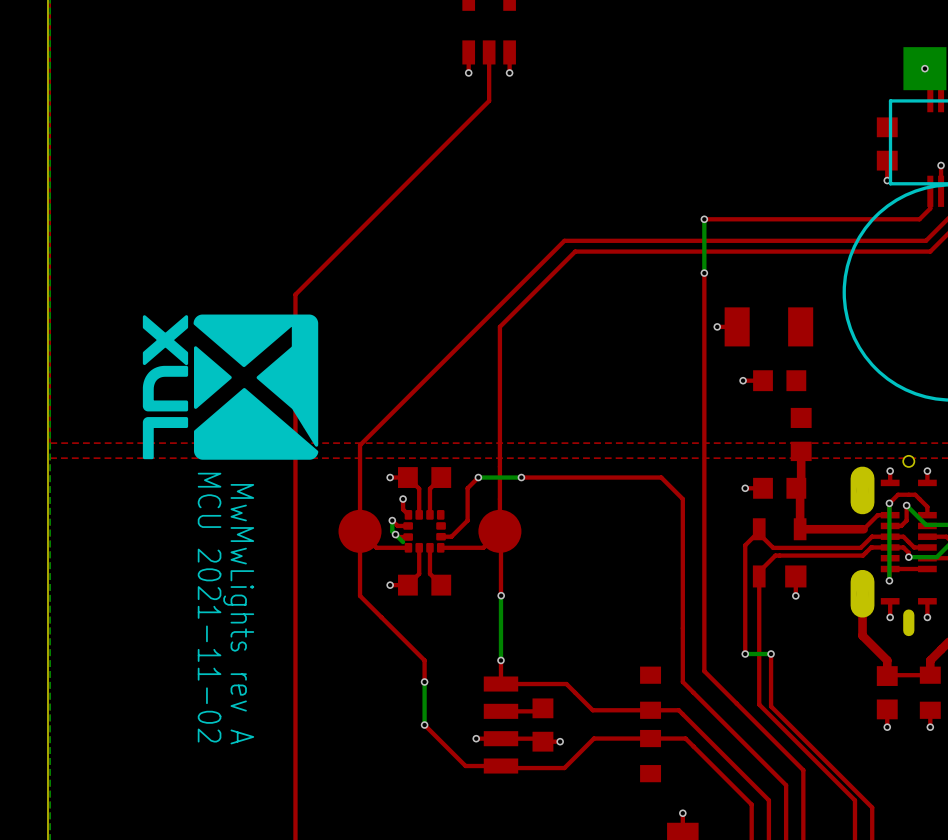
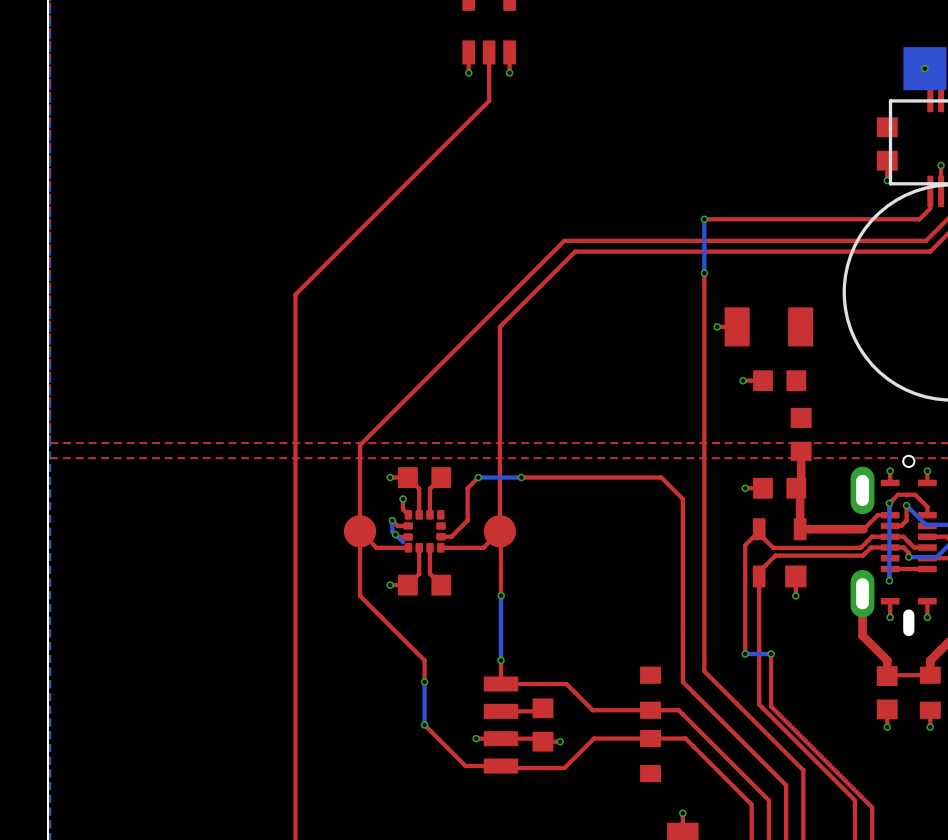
drawing: [142, 314, 319, 460] -> none
part footprint: [338, 509, 382, 553] -> [343, 515, 377, 548]
part footprint: [478, 509, 522, 553] -> [483, 515, 517, 548]
text: MCU 2021-11-02 (209, 607) -> none
text: MwMwLights rev A (238, 614) -> none

